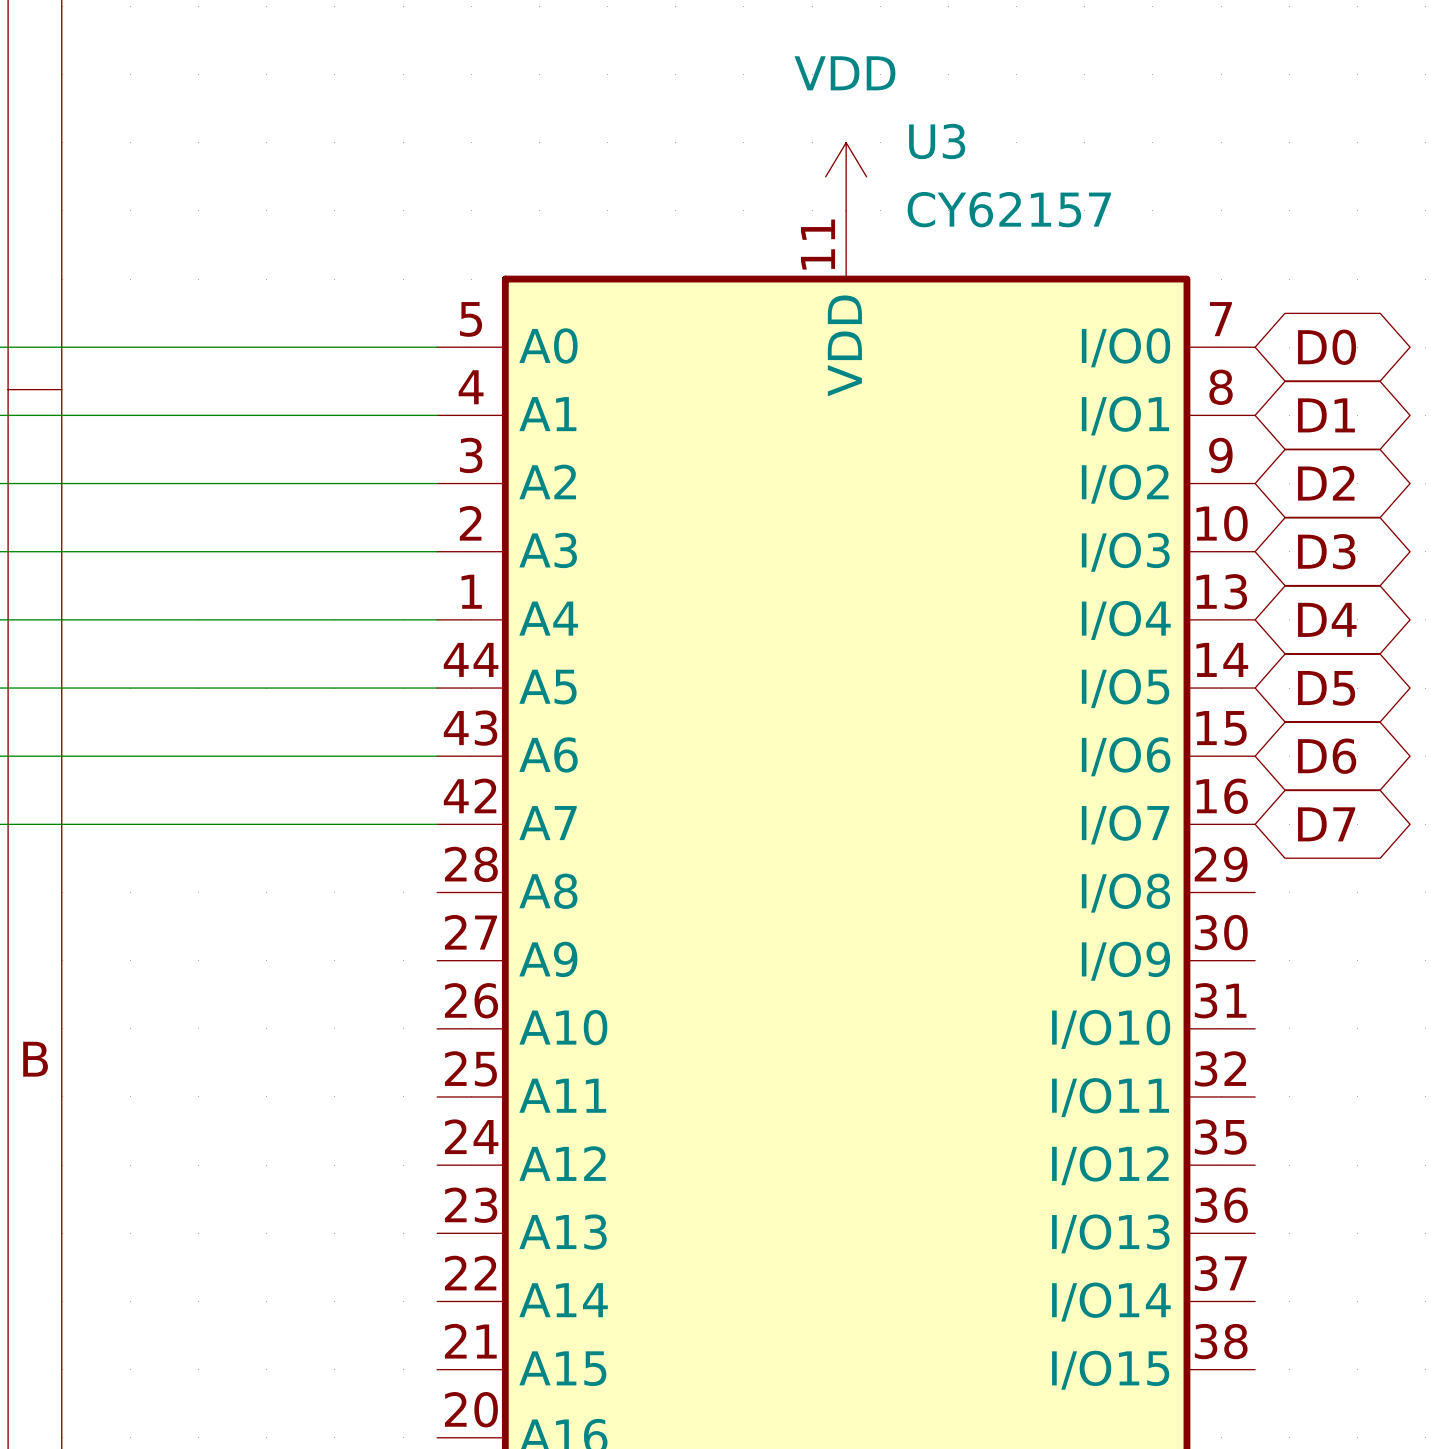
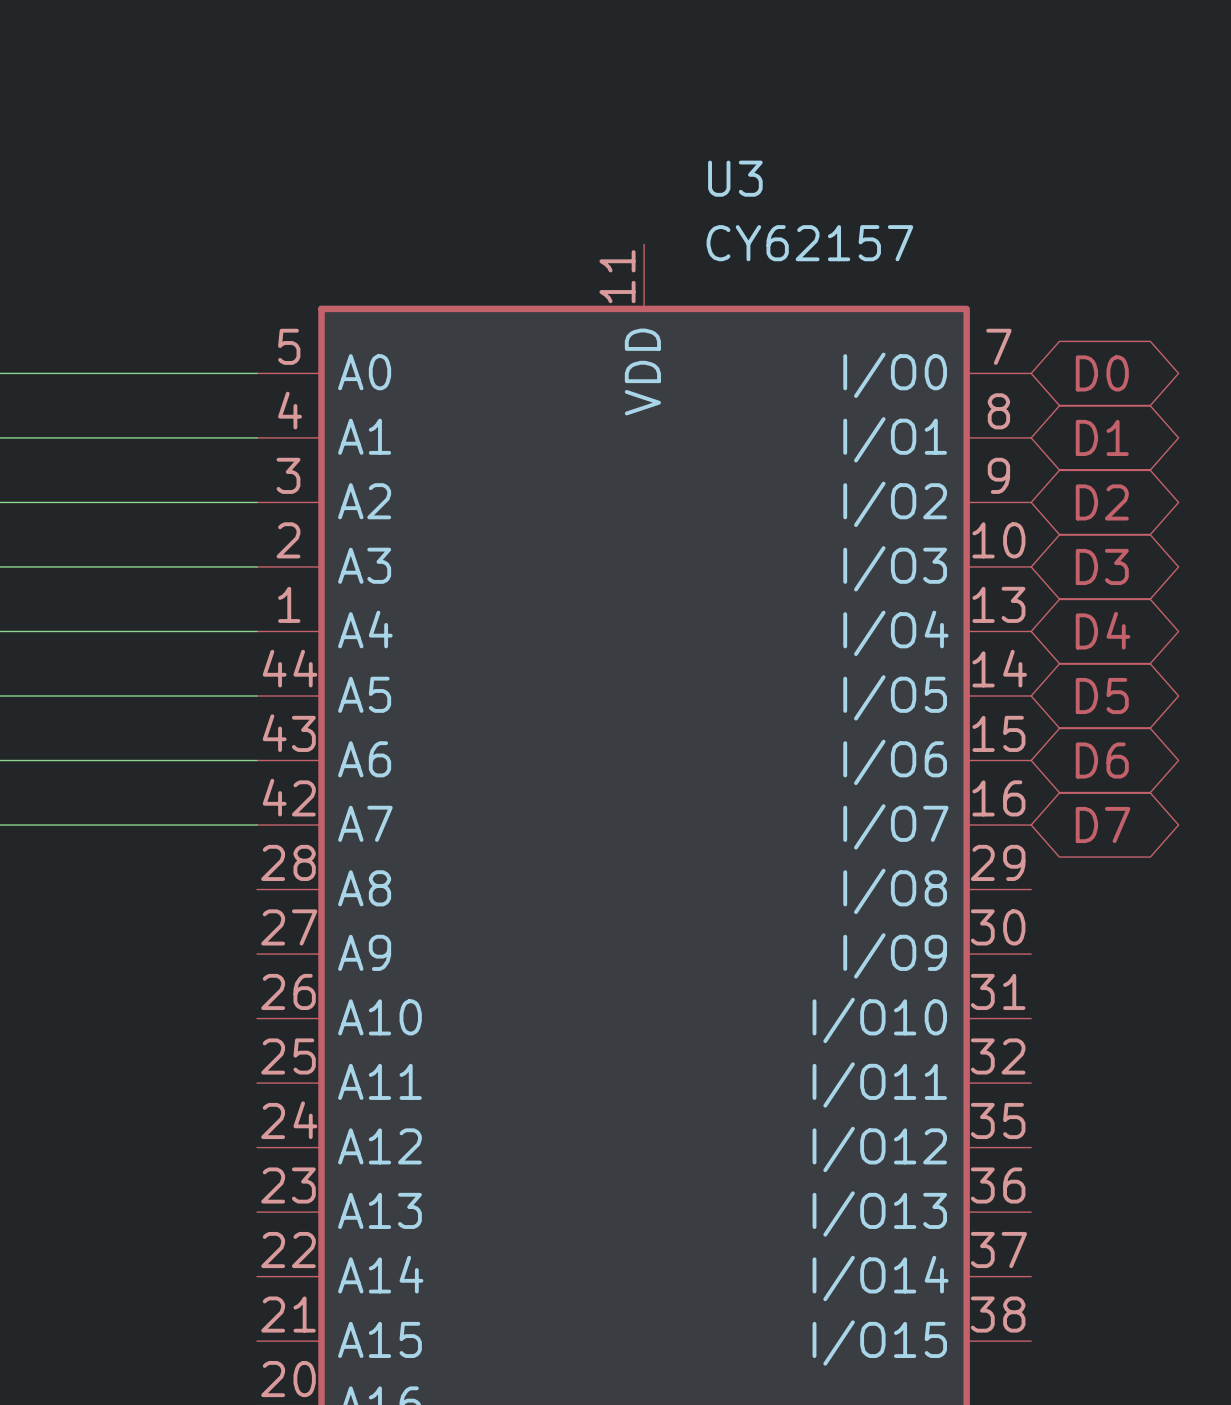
power symbol: VDD (846, 176) -> none

